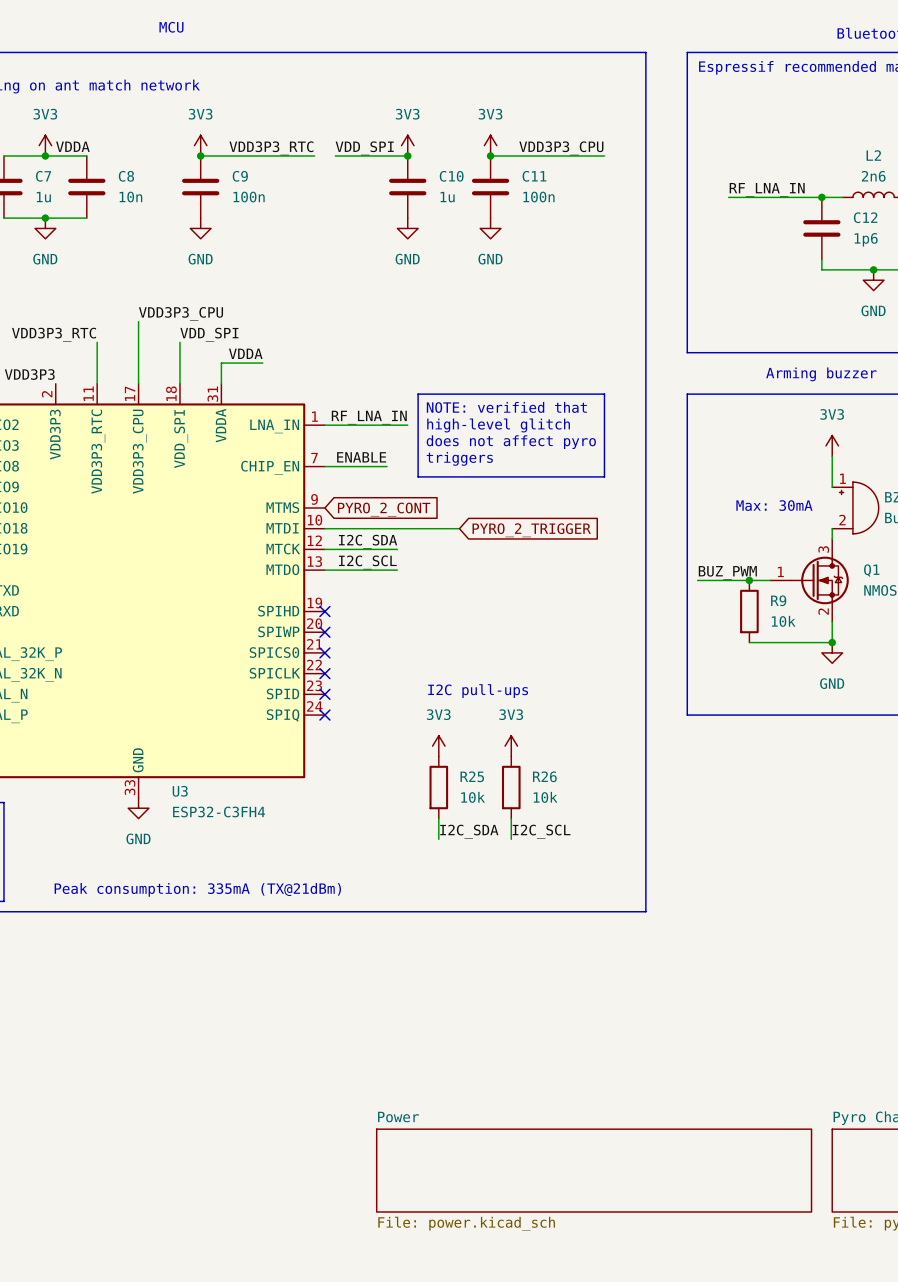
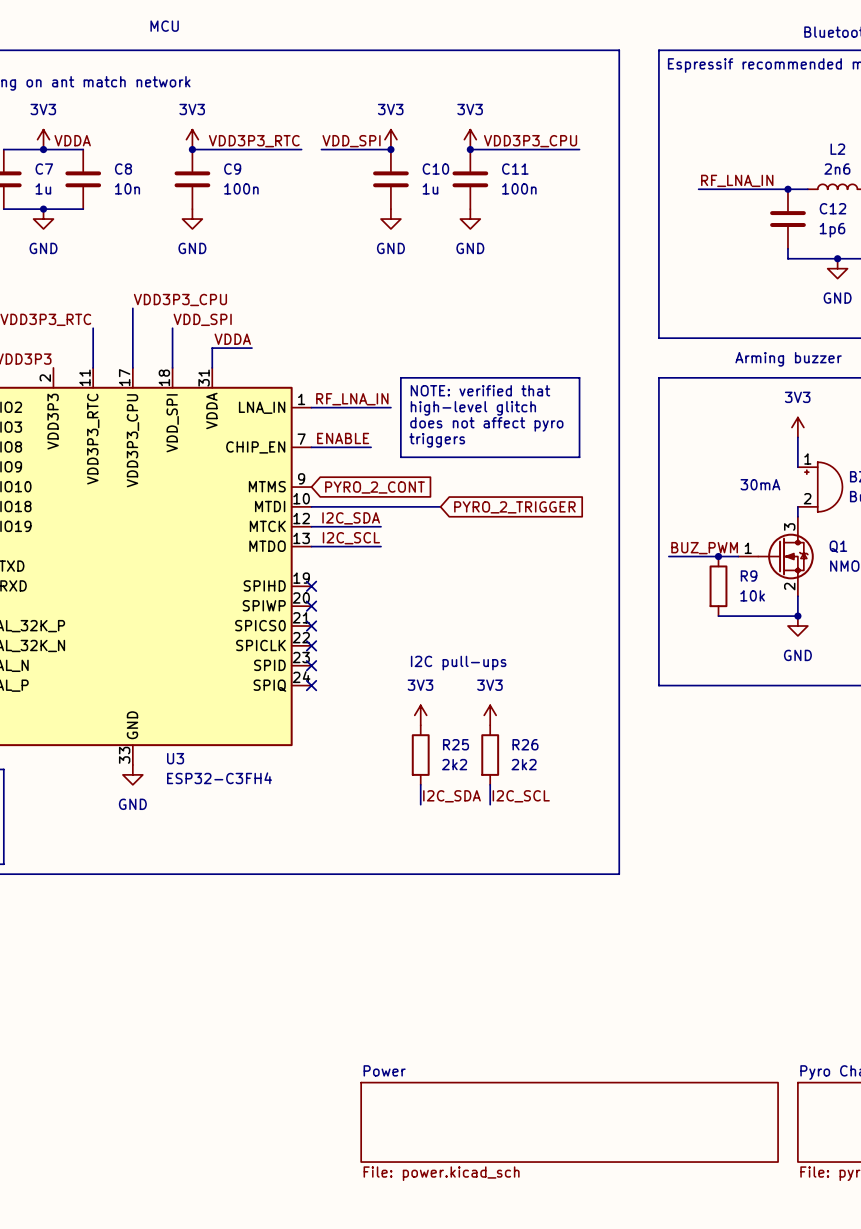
text: Max: 30mA (774, 505) -> 30mA (760, 484)
R25 value: 10k (473, 797) -> 2k2 (454, 764)
R26 value: 10k (545, 797) -> 2k2 (524, 764)
text: Peak consumption: 335mA (TX@21dBm) (197, 889) -> none

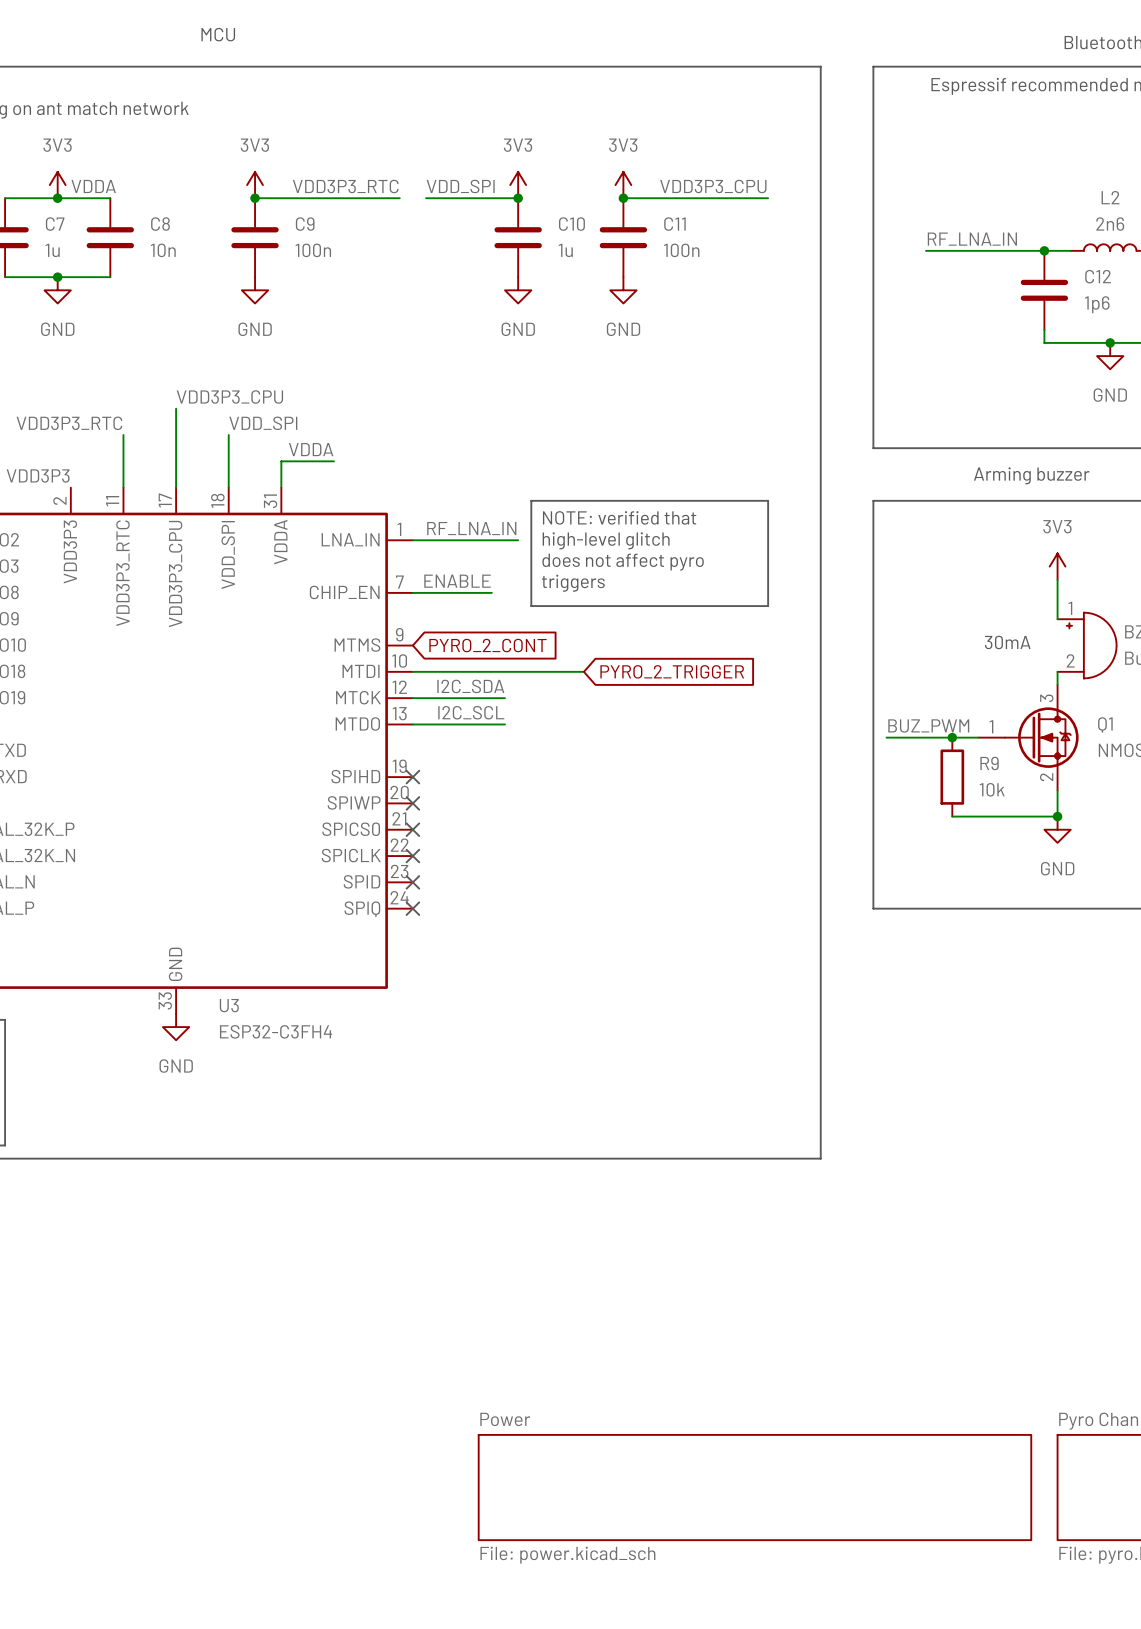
text: I2C pull-ups (458, 663) -> none
power symbol: 3V3 (420, 715) -> none
power symbol: 3V3 (490, 715) -> none
R25: 2k2 (420, 755) -> none
R26: 2k2 (490, 755) -> none
wire: (420, 784) (420, 804) -> none
wire: (490, 784) (490, 804) -> none
label: I2C_SDA (451, 796) -> none
label: I2C_SCL (521, 796) -> none

